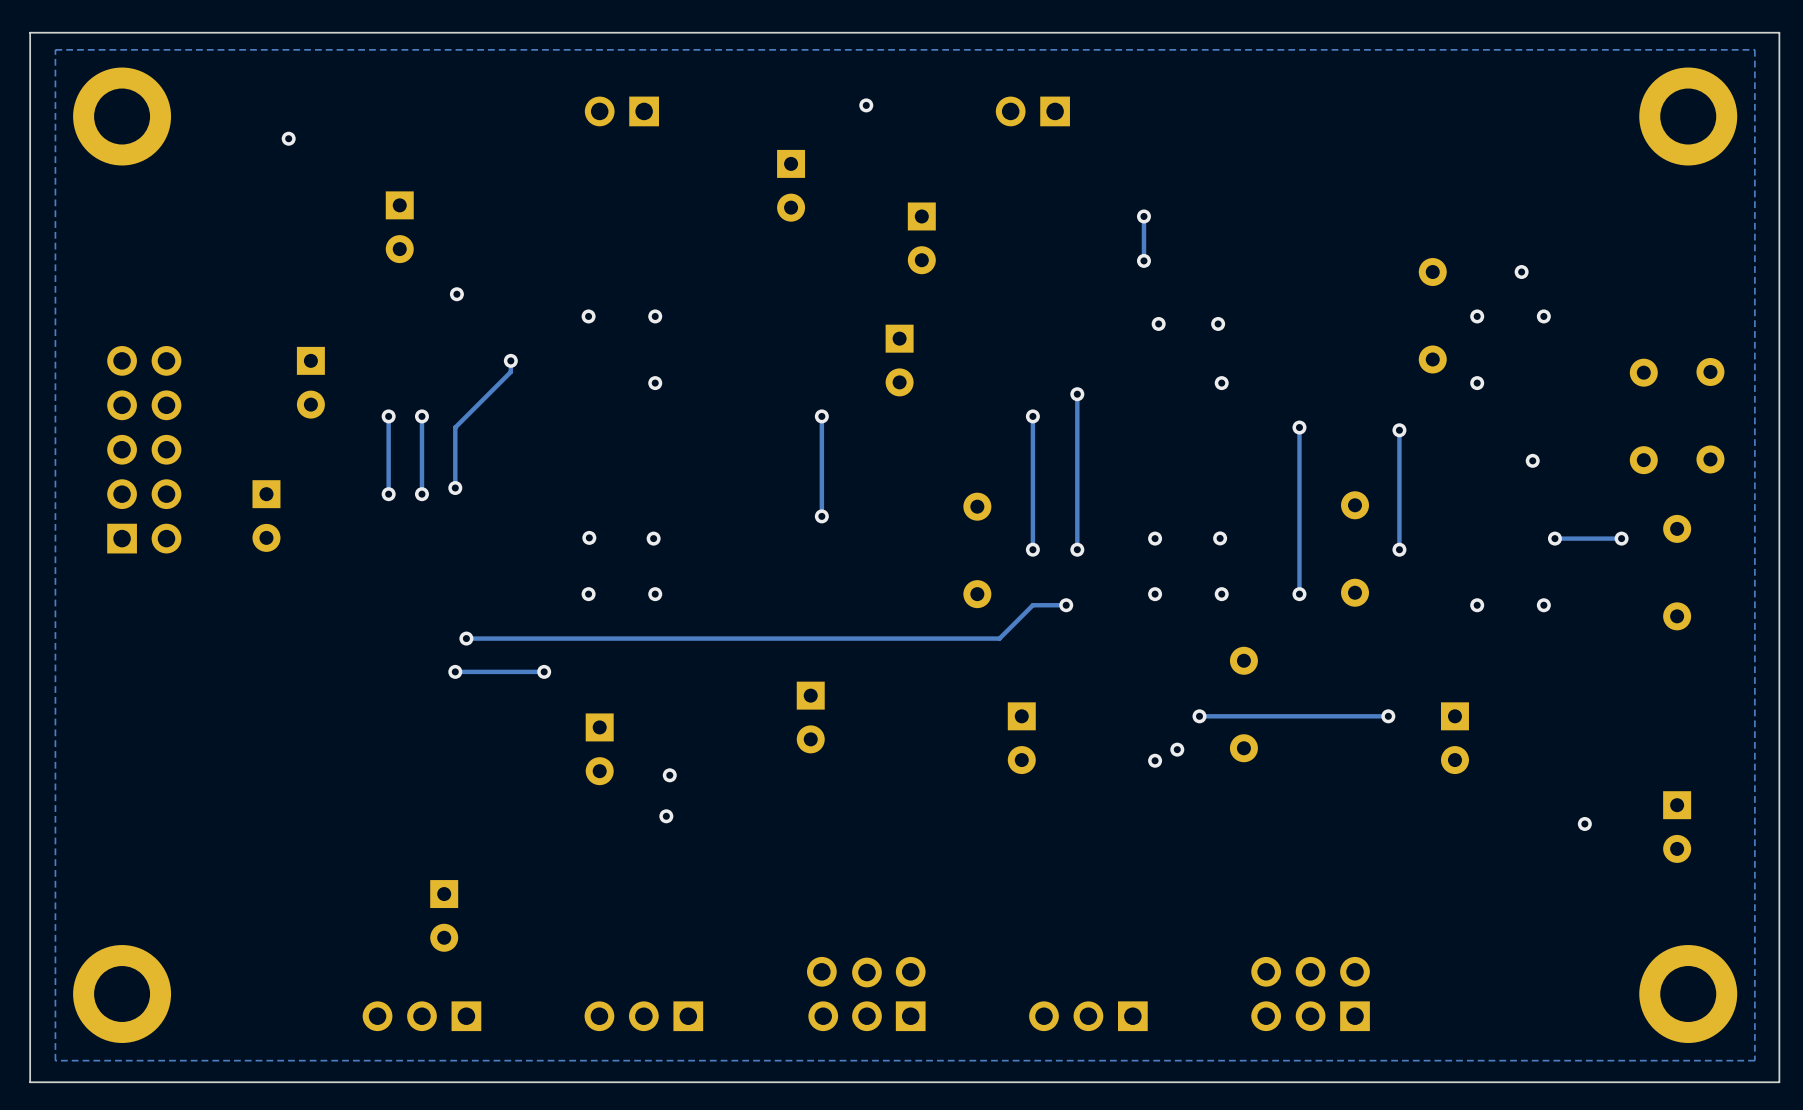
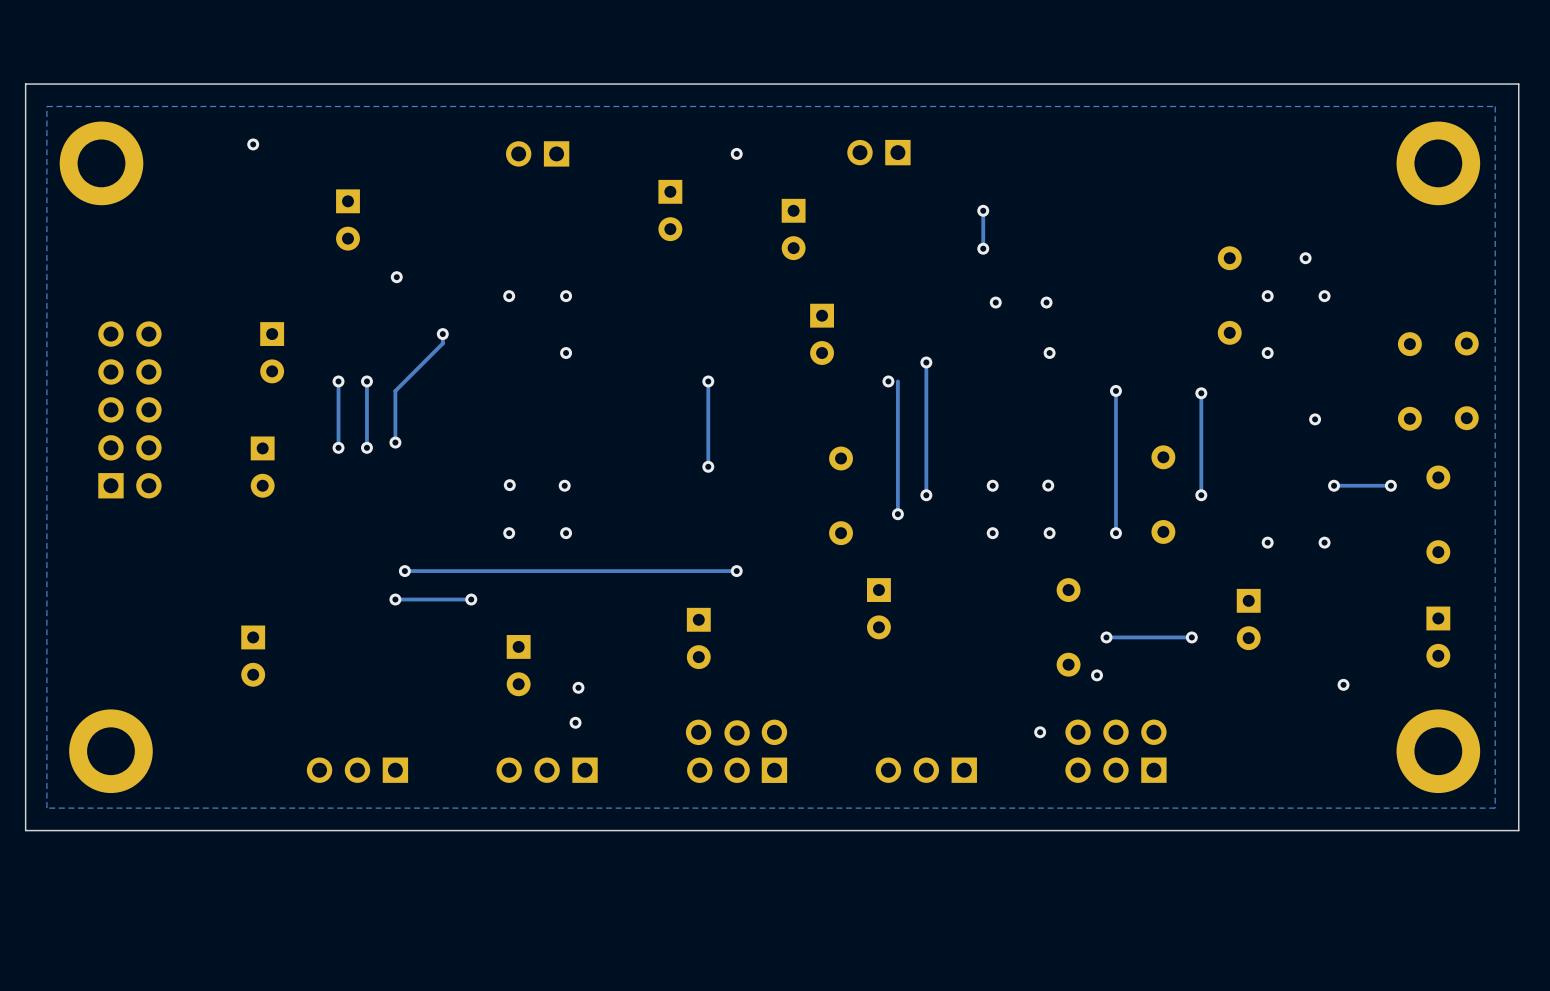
board edge: (1779, 32) (30, 32) (30, 1082) (1779, 1082) (1779, 32) -> (1518, 84) (1518, 830) (25, 830) (25, 84) (1518, 84)
zone outline: (1754, 49) (55, 49) (55, 1060) (1754, 1060) (1754, 49) -> (1495, 106) (1495, 808) (46, 808) (46, 106) (1495, 106)
via position: (866, 105) -> (736, 153)
part position: (621, 111) -> (537, 153)
part position: (1032, 111) -> (878, 152)
part position: (122, 116) -> (101, 163)
part position: (1688, 116) -> (1438, 163)
part position: (791, 185) -> (670, 210)
part position: (899, 360) -> (822, 334)
track: (1032, 416) (1032, 549) -> none
track: none -> (897, 381) (897, 514)
part position: (266, 516) -> (262, 467)
via: (1032, 549) -> none
via: none -> (897, 514)
track: (1066, 605) (1032, 605) (999, 638) (855, 638) -> none
via: (1066, 605) -> none
via: none -> (736, 571)
via: (1199, 716) -> none
track: (1288, 716) (1199, 716) -> none
via: none -> (1106, 637)
part: none -> (253, 656)
part position: (1021, 738) -> (878, 608)
part position: (1454, 738) -> (1248, 619)
via: (1177, 749) -> none
via: (1155, 760) -> none
via: none -> (1097, 675)
via position: (1584, 823) -> (1343, 684)
via: none -> (1040, 732)
part position: (1677, 827) -> (1438, 637)
part: none -> (357, 770)
part: none -> (547, 770)
part: (444, 915) -> none
part position: (122, 994) -> (110, 751)
part position: (866, 994) -> (736, 751)
part position: (1310, 994) -> (1115, 751)
part position: (1688, 994) -> (1438, 751)
part: (421, 1016) -> none
part: (643, 1016) -> none
part position: (1088, 1016) -> (926, 770)

